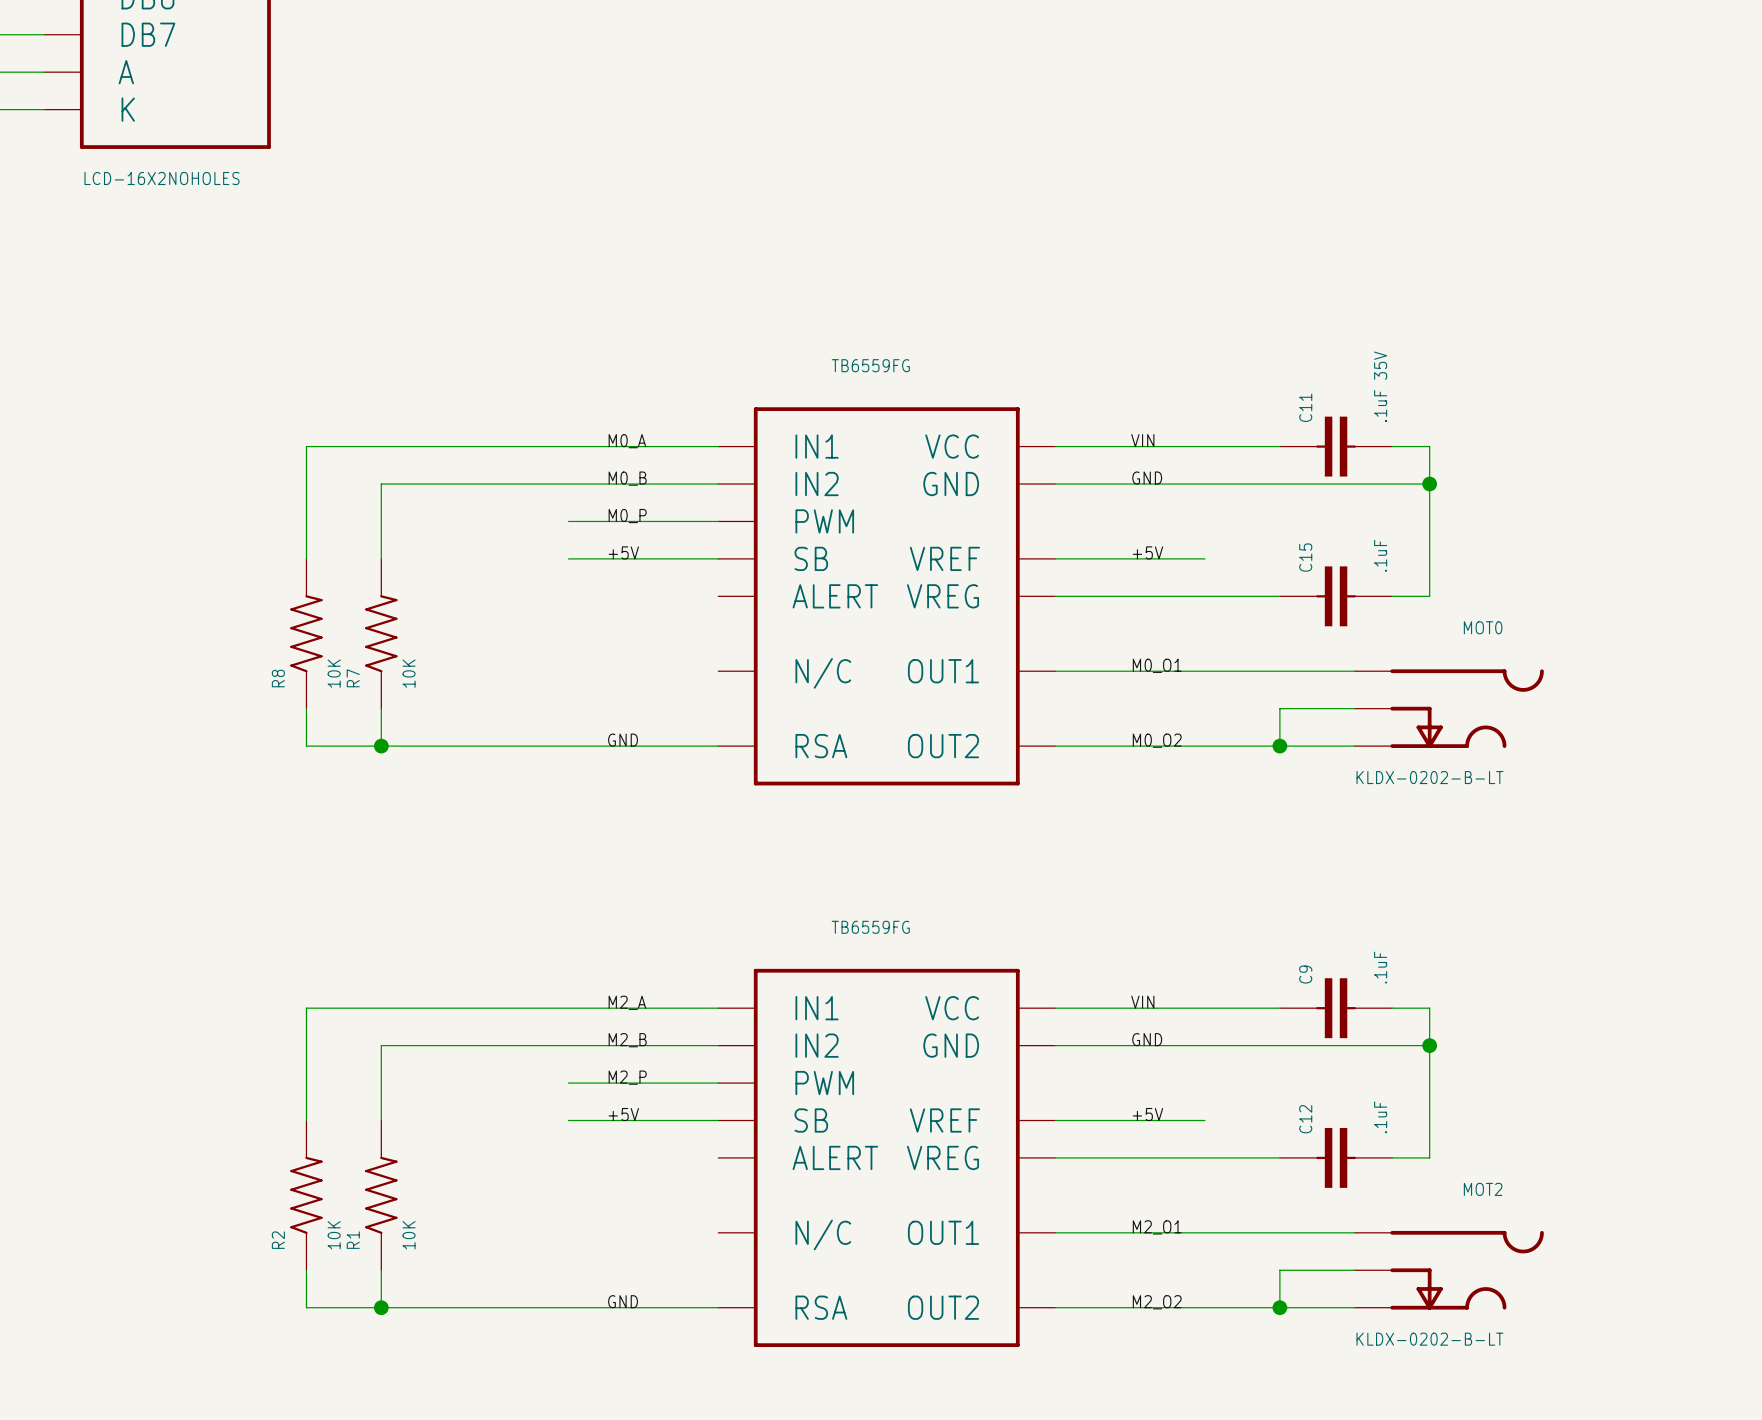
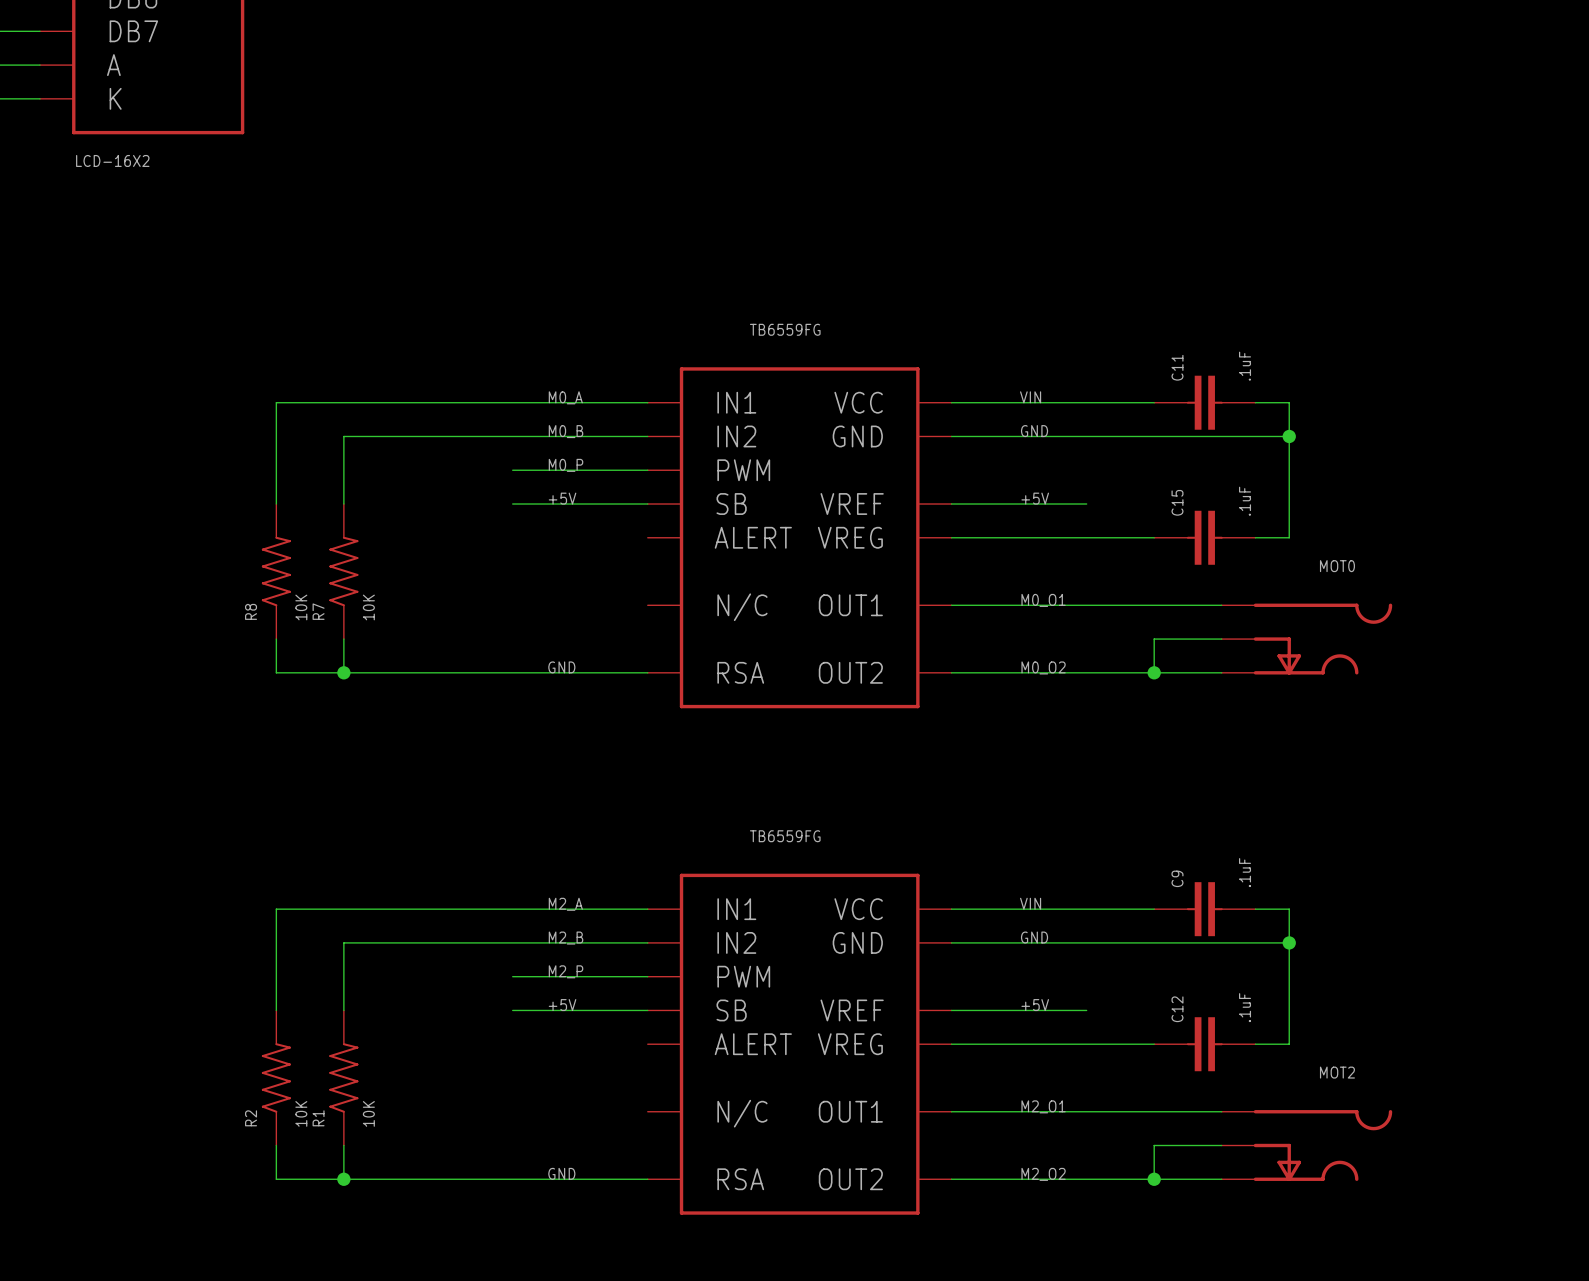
part value: LCD-16X2NOHOLES (162, 178) -> LCD-16X2 (112, 160)
C11 value: .1uF 35V (1380, 386) -> .1uF (1245, 366)
MOT0 value: KLDX-0202-B-LT (1429, 777) -> none
MOT2 value: KLDX-0202-B-LT (1429, 1339) -> none

